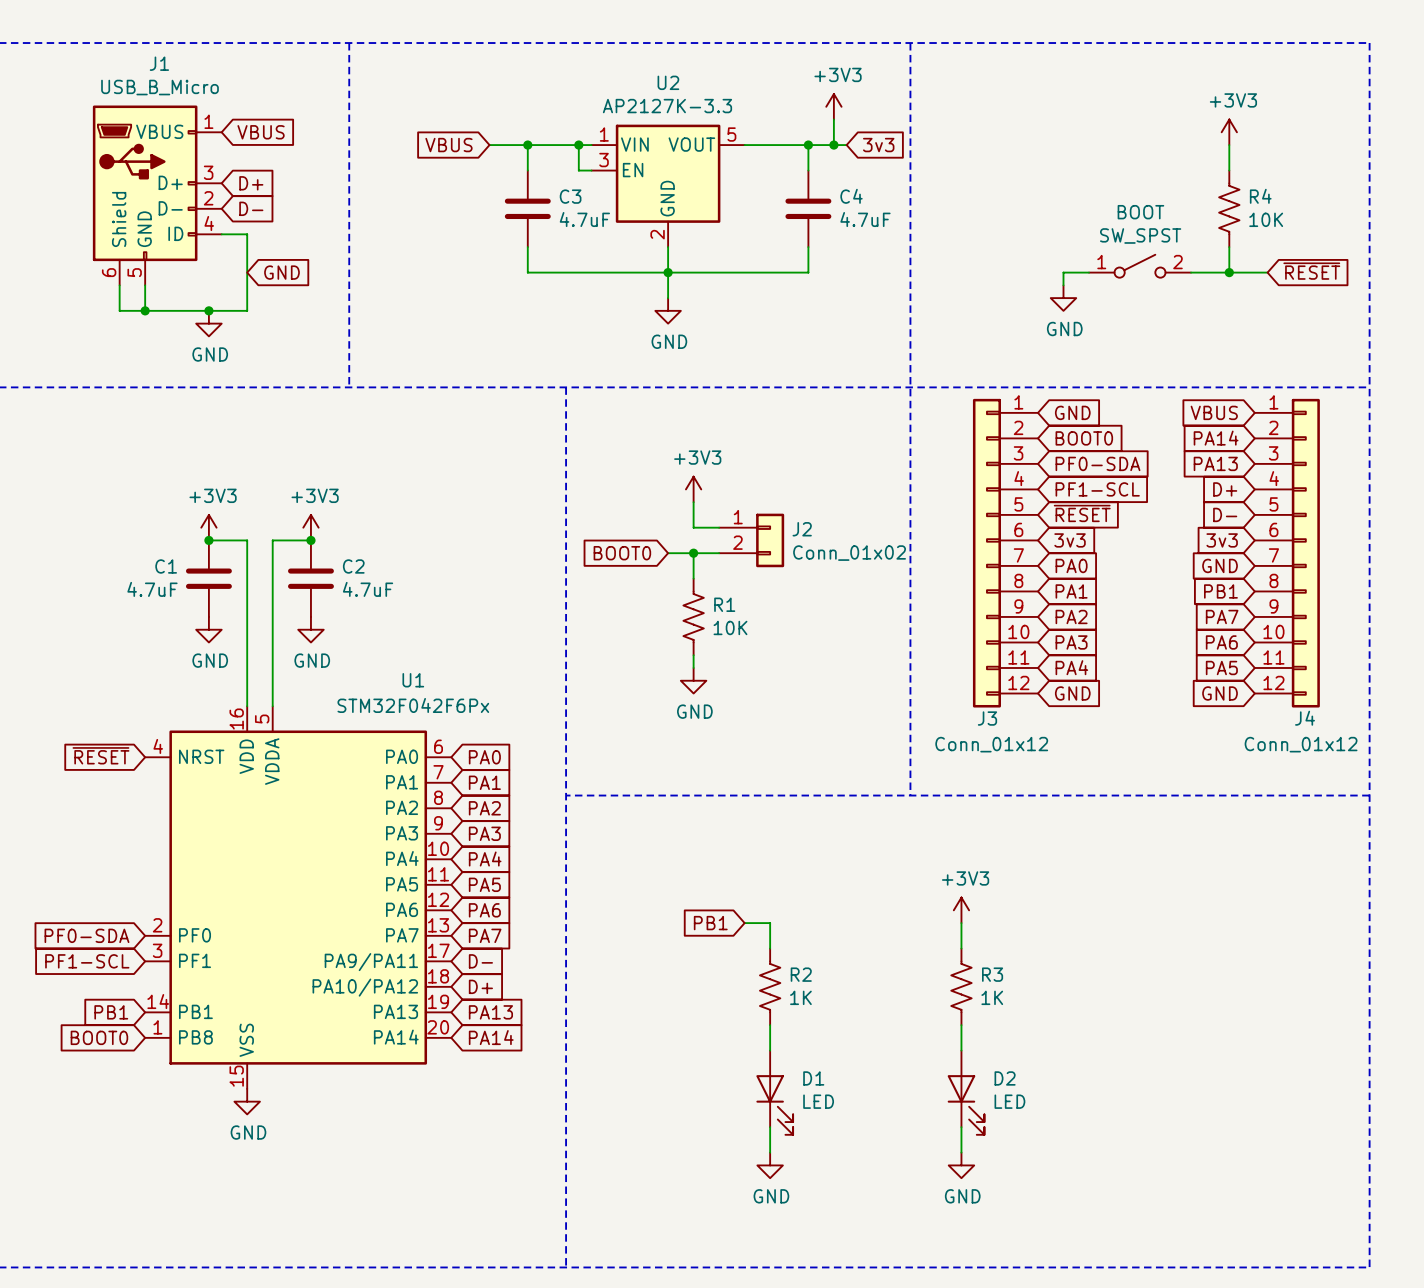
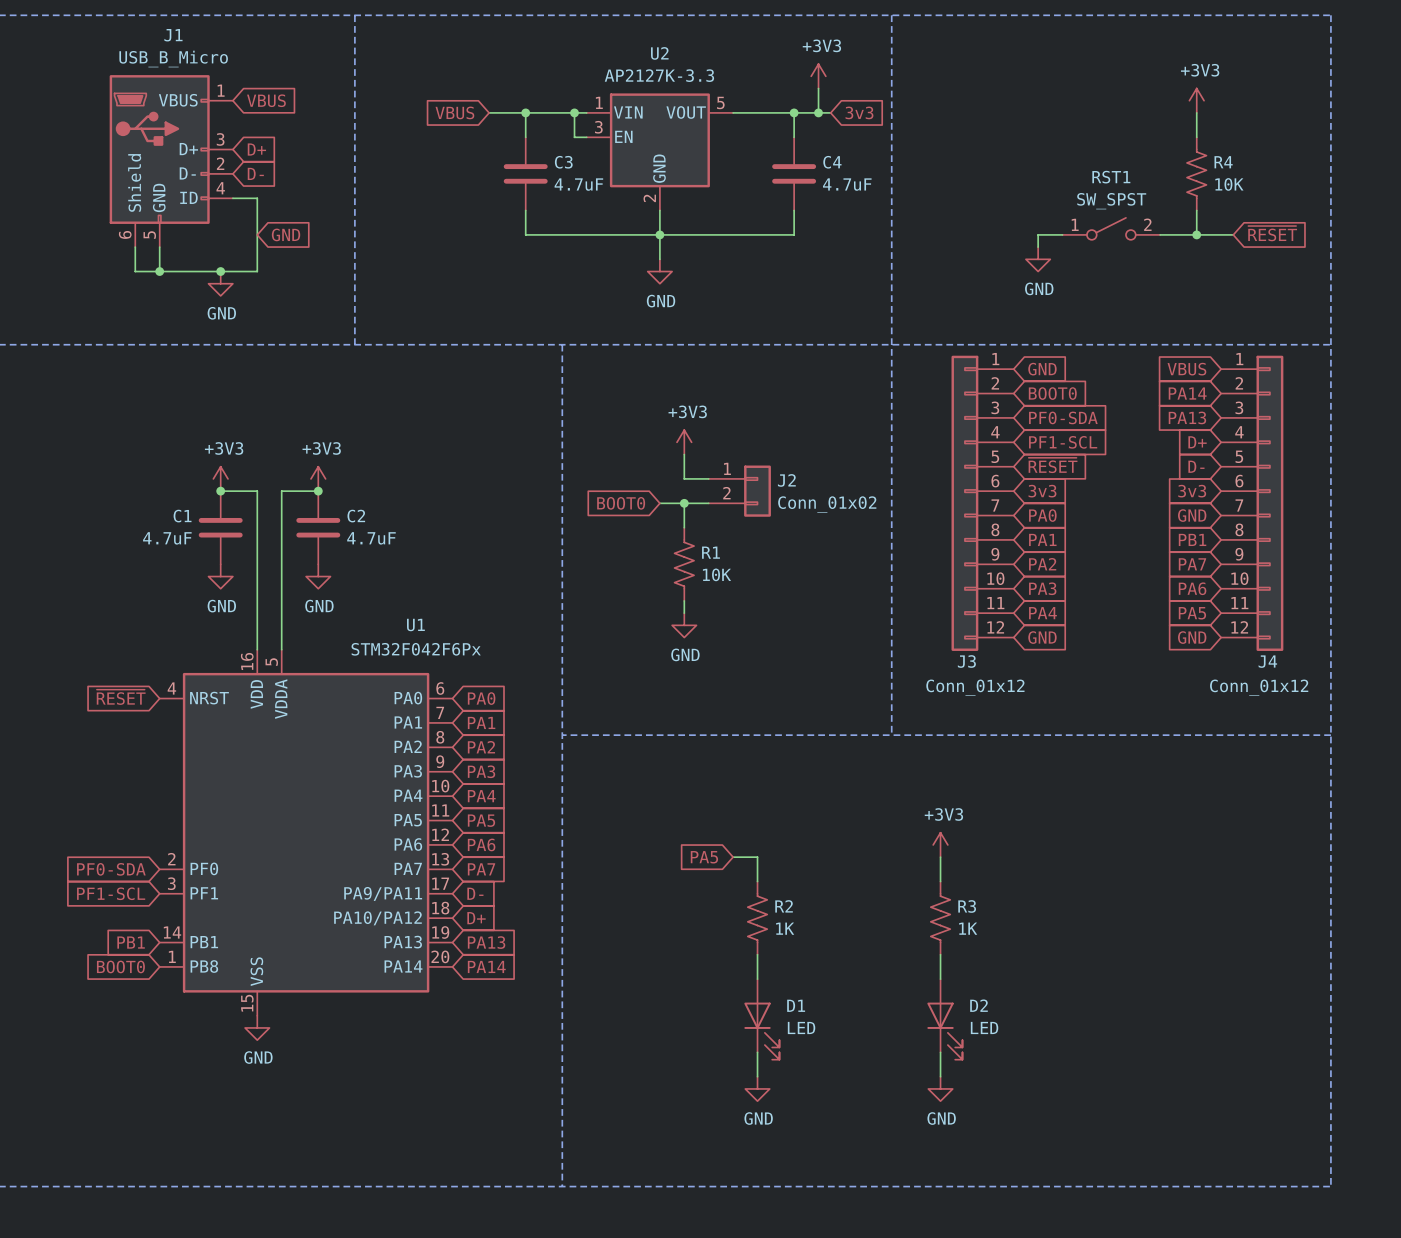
BOOT name: BOOT (1140, 212) -> RST1 (1111, 177)
global label: PB1 (710, 923) -> PA5 (704, 857)

